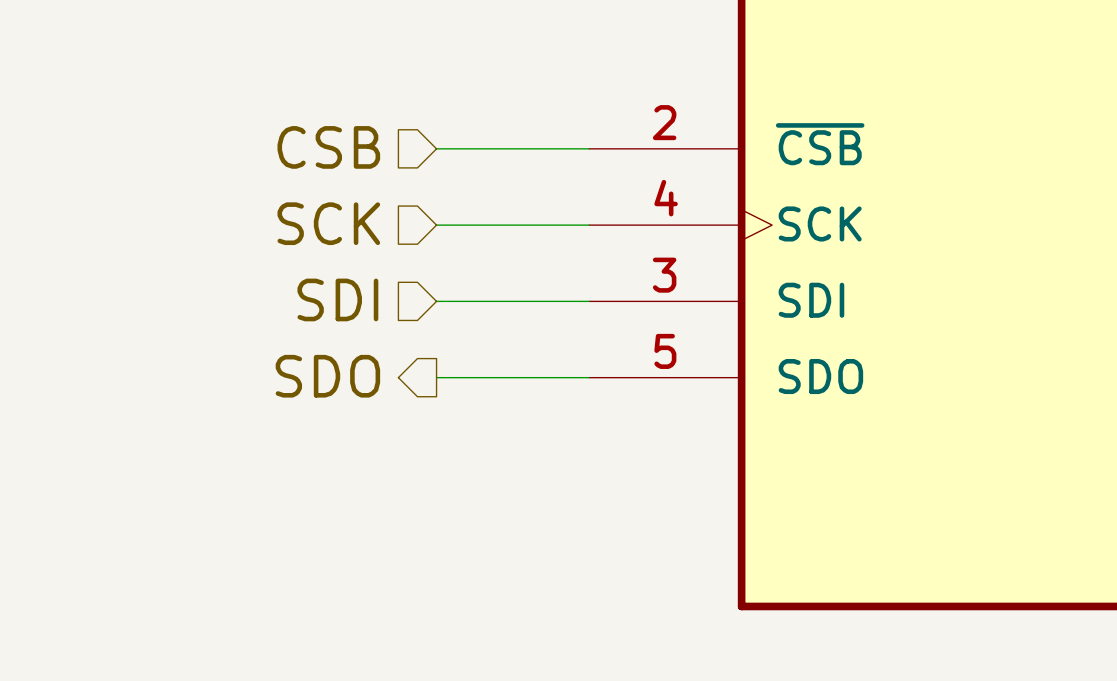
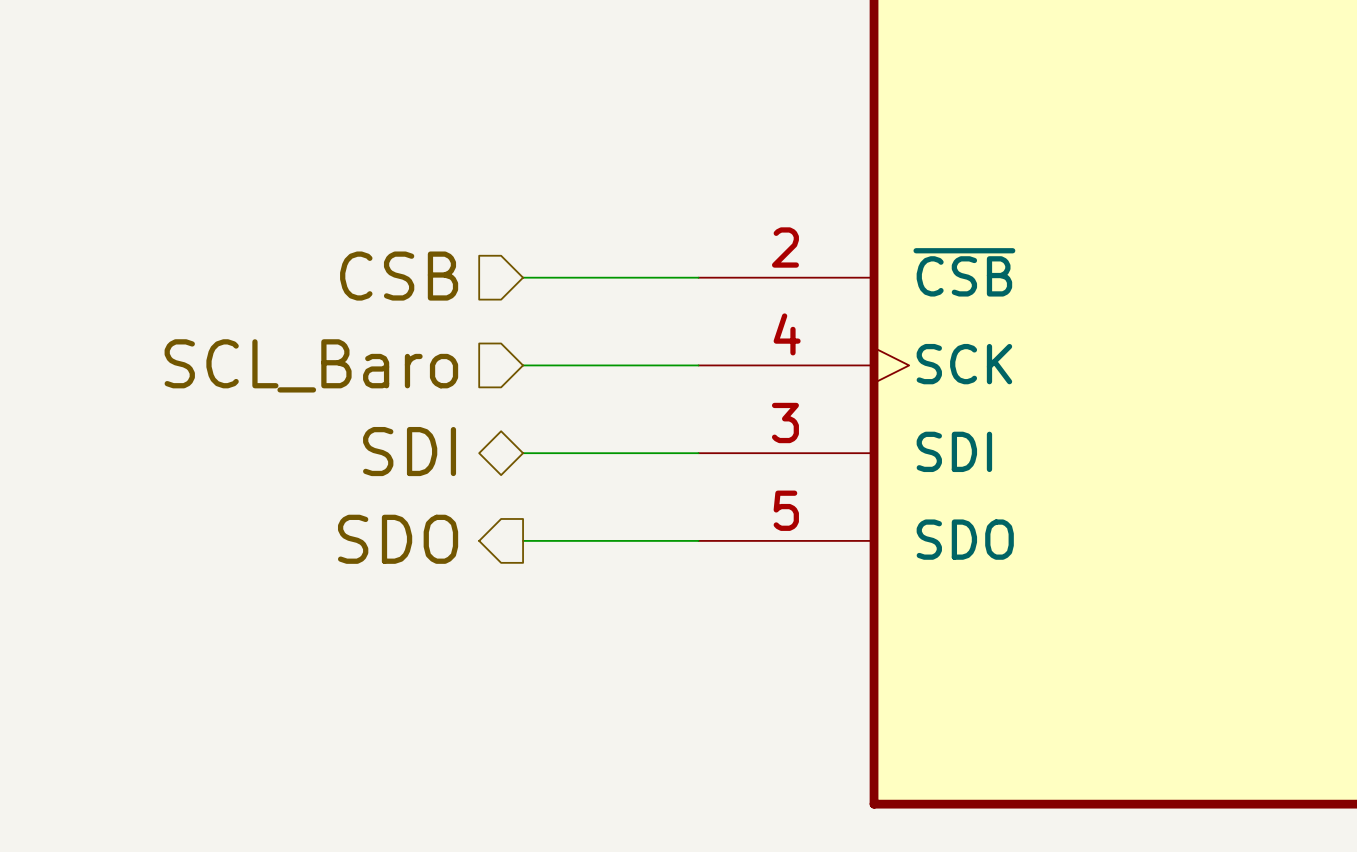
hierarchical label: SCK (328, 223) -> SCL_Baro (311, 365)
hierarchical label shape: input (337, 299) -> bidirectional (409, 451)

